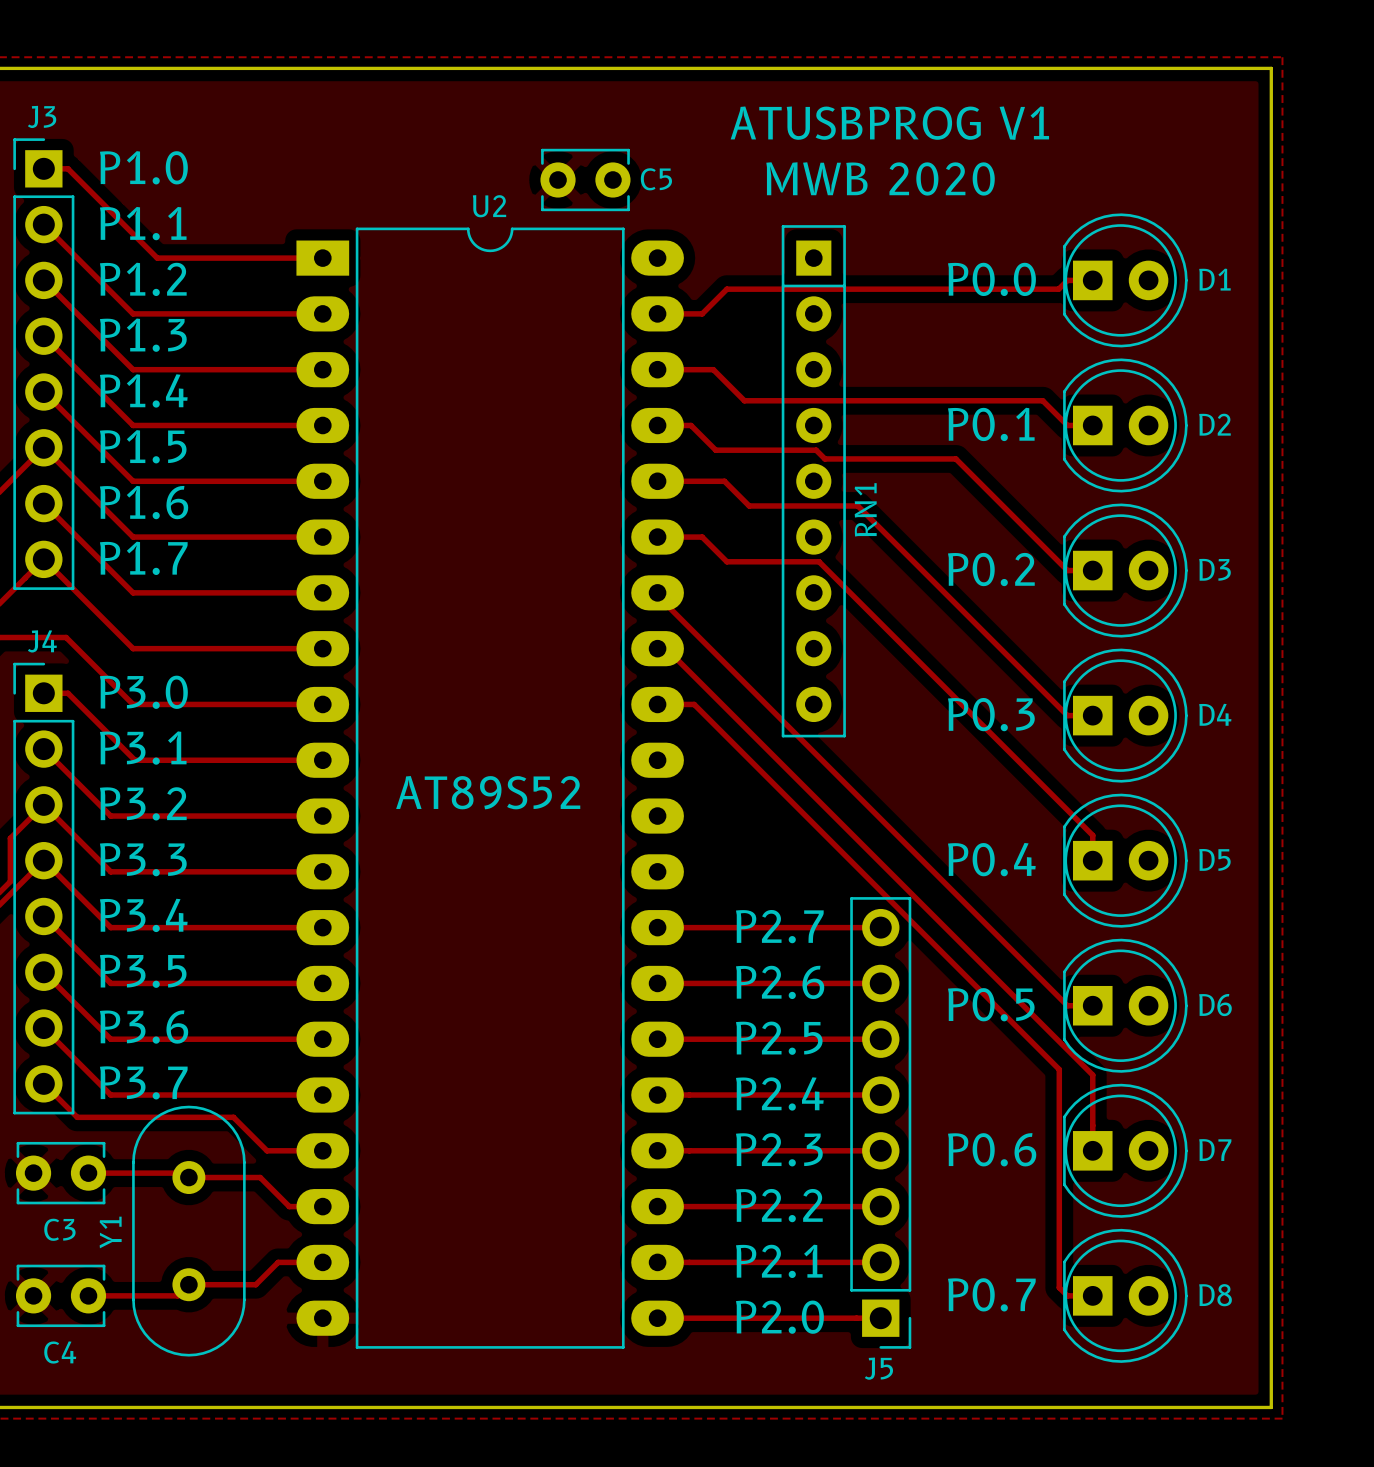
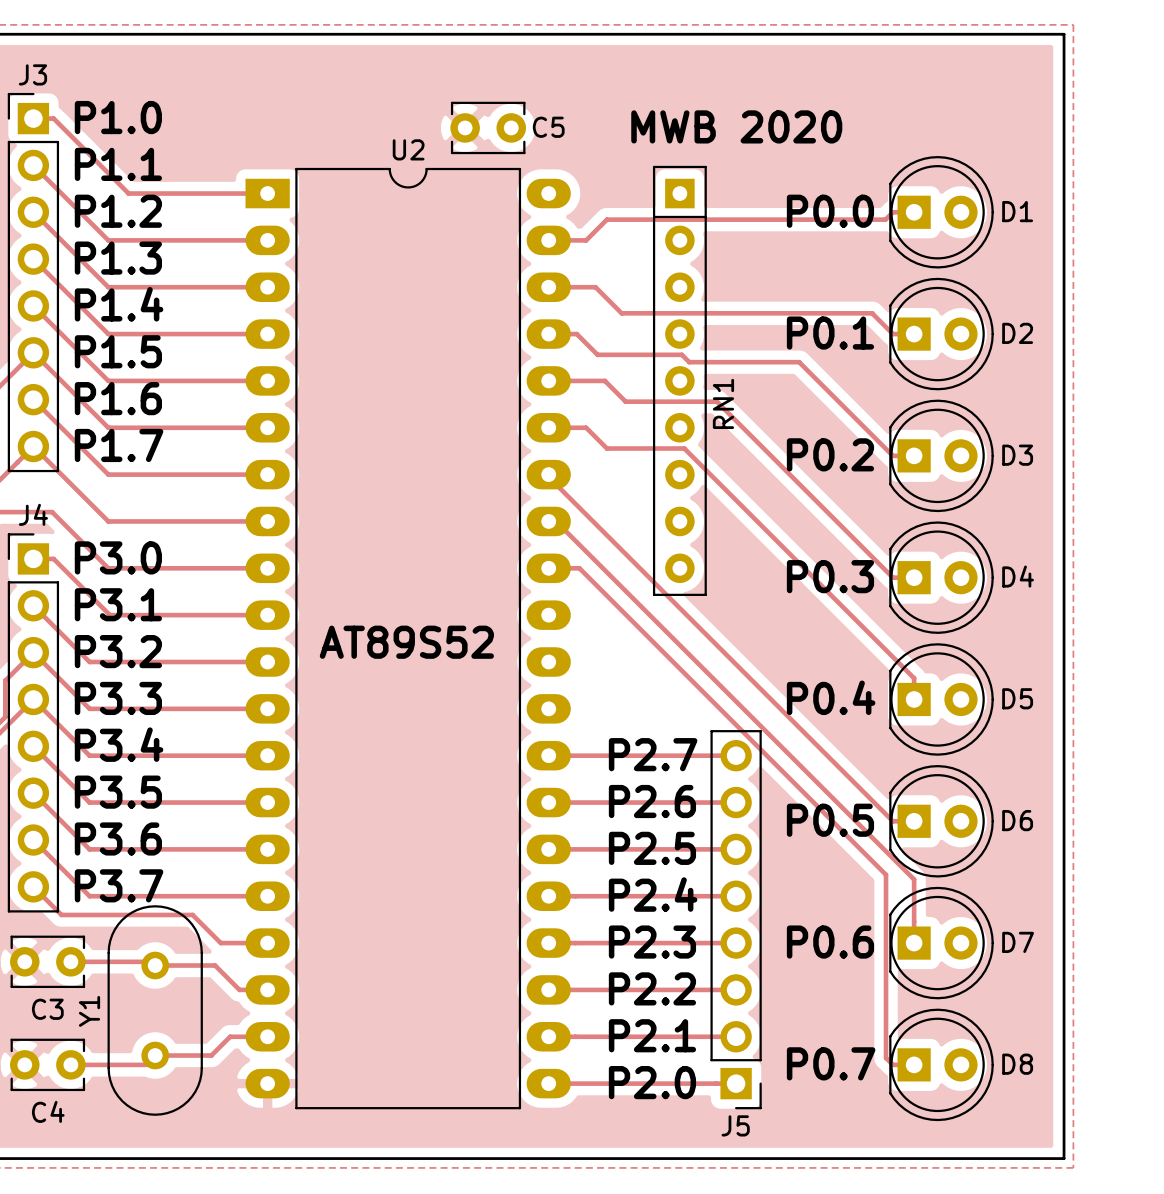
text: ATUSBPROG V1 (889, 123) -> none

